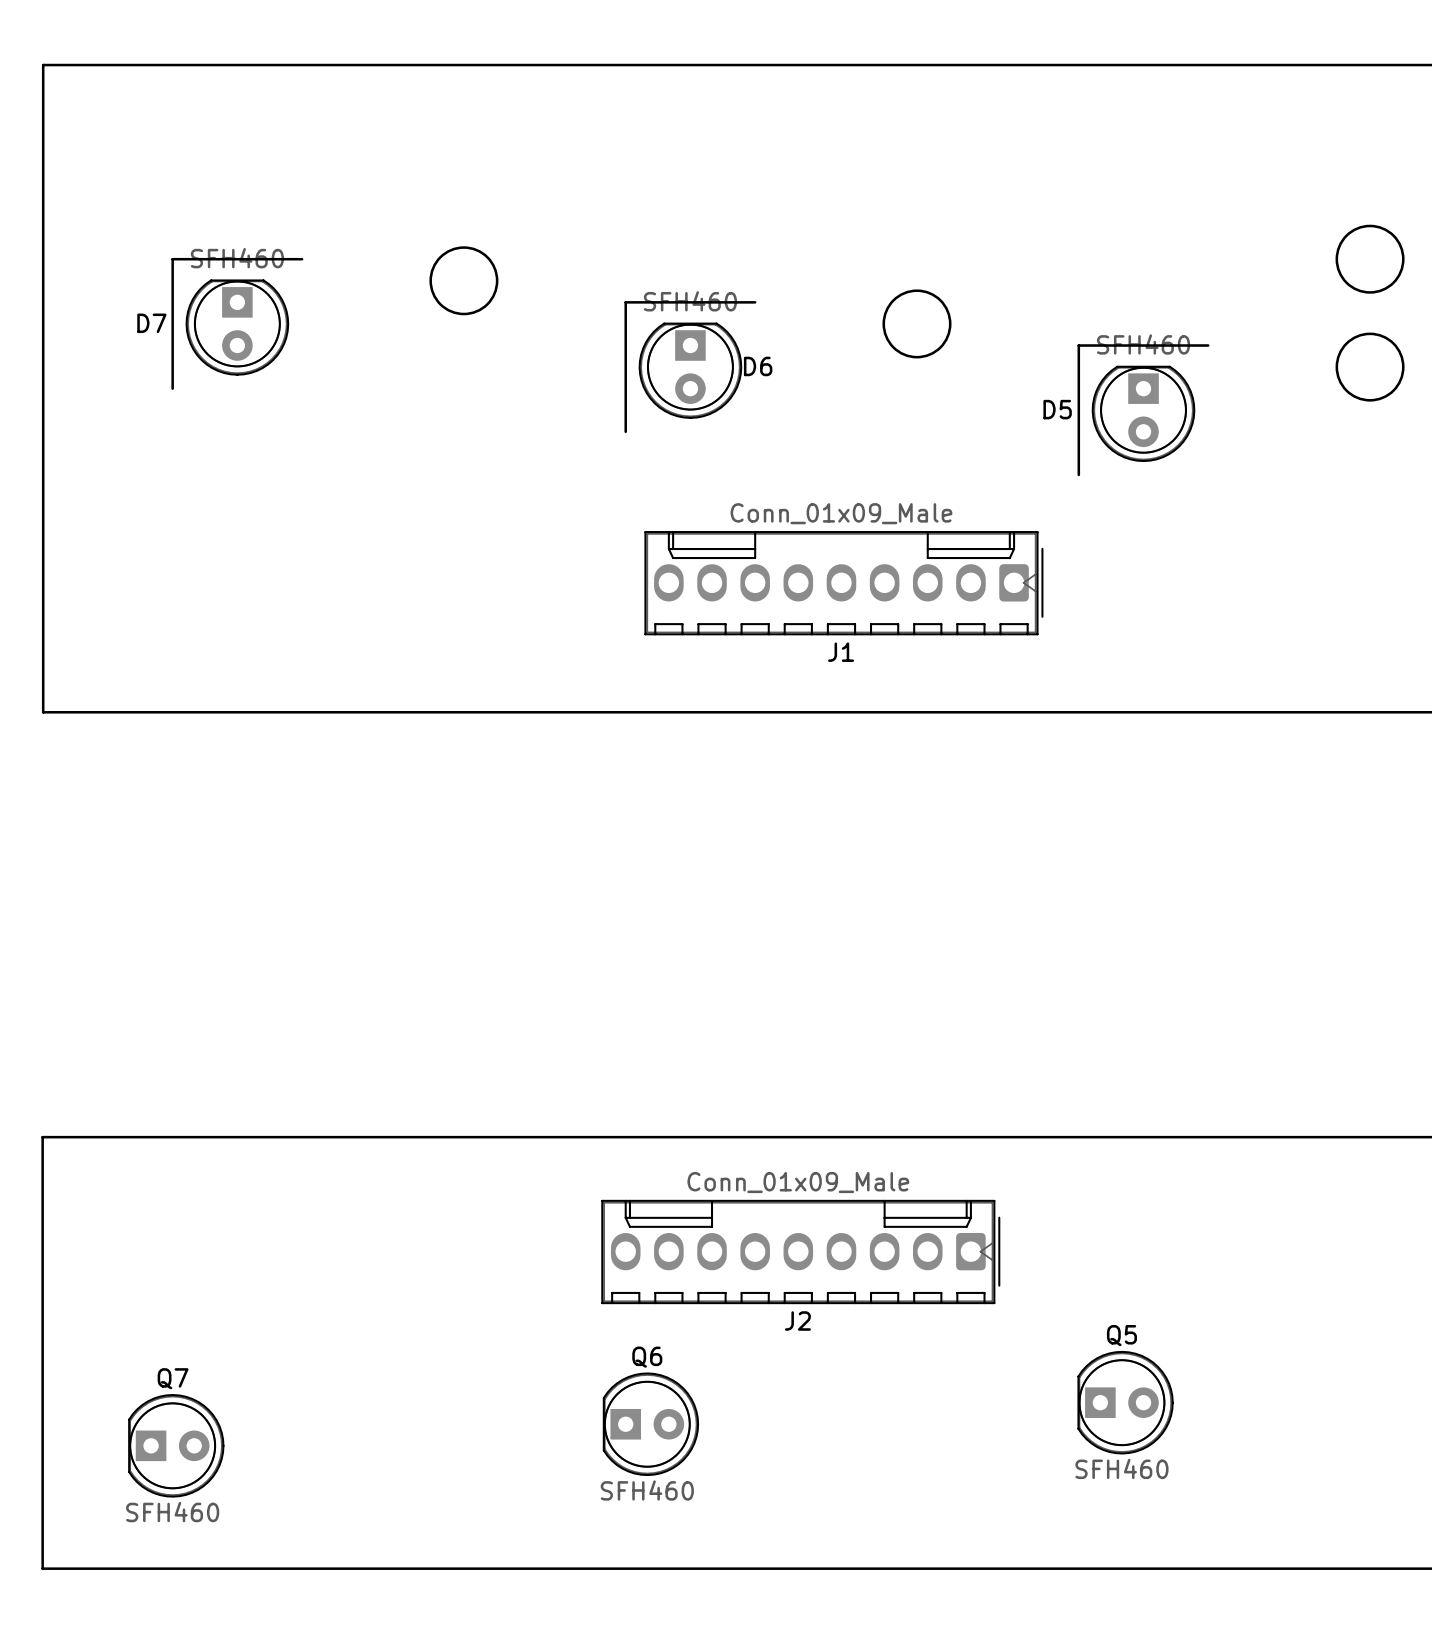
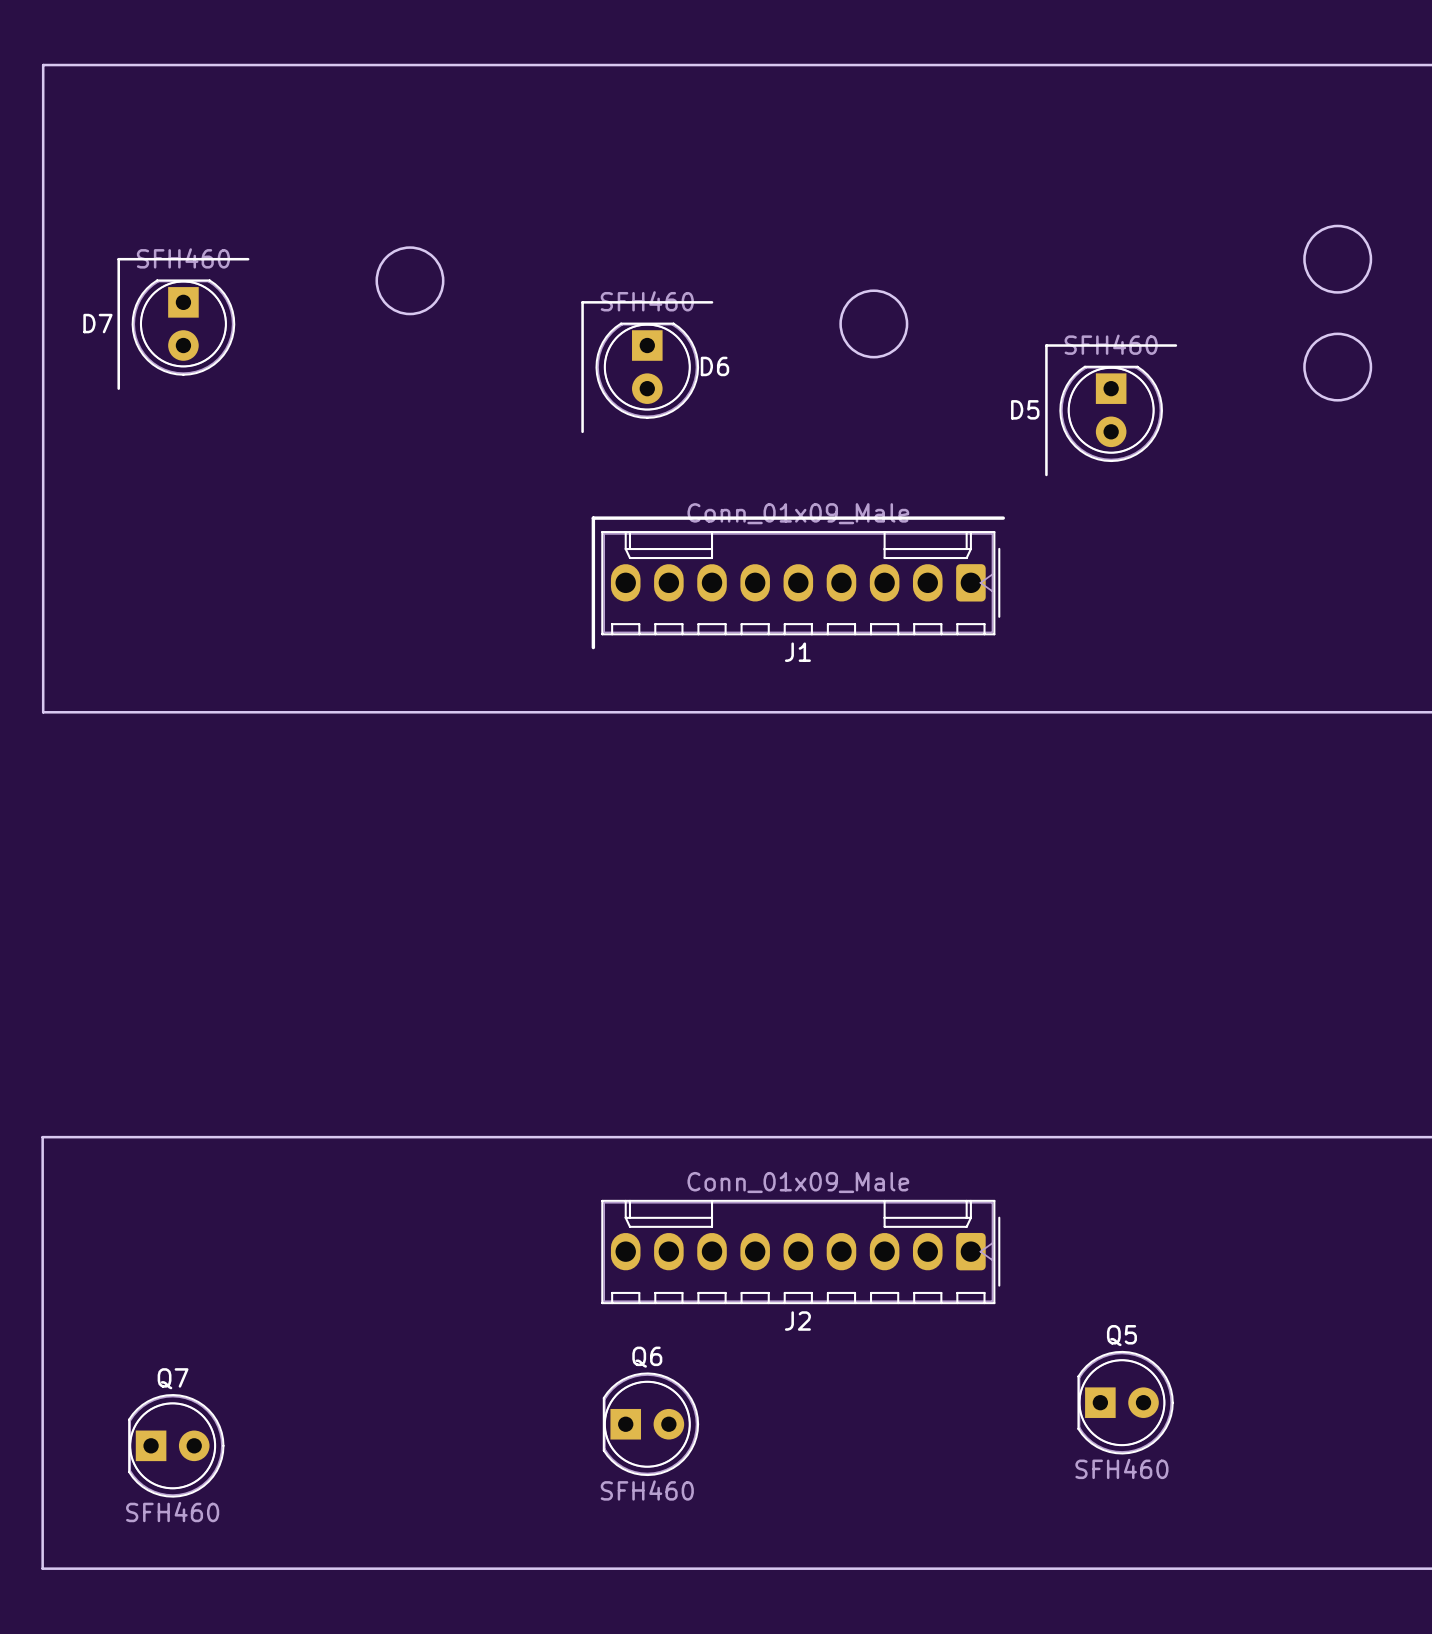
line: (172, 259) (172, 388) -> (172, 259) (118, 259) (118, 388)
line: (248, 259) (302, 259) -> none
round board edge position: (1370, 259) -> (1337, 259)
round board edge position: (463, 280) -> (409, 280)
line: (625, 302) (625, 431) -> (625, 302) (582, 302) (582, 431)
line: (712, 302) (755, 302) -> none
round board edge position: (916, 323) -> (873, 323)
D7 position: (237, 327) -> (183, 327)
line: (1078, 345) (1078, 474) -> (1078, 345) (1046, 345) (1046, 474)
line: (1175, 345) (1208, 345) -> none
round board edge position: (1370, 367) -> (1337, 367)
D6 position: (690, 370) -> (647, 370)
D5 position: (1143, 413) -> (1111, 413)
line: none -> (1003, 518) (593, 518) (593, 647)
J1 position: (843, 583) -> (800, 583)

